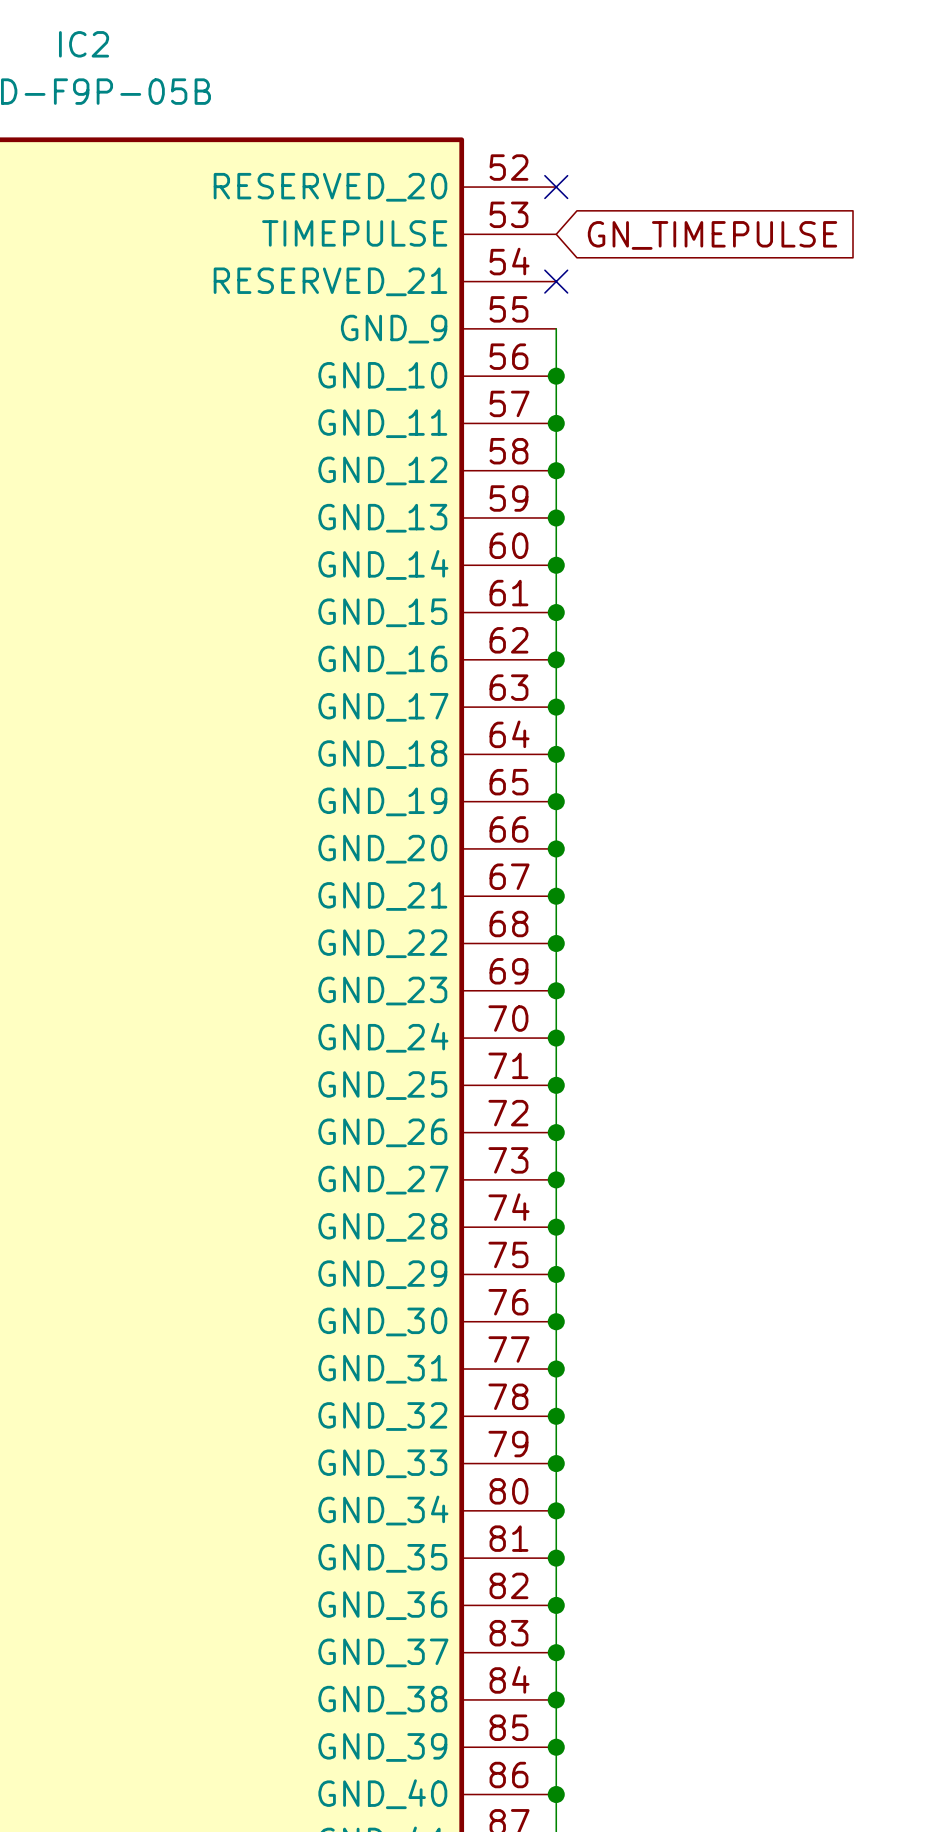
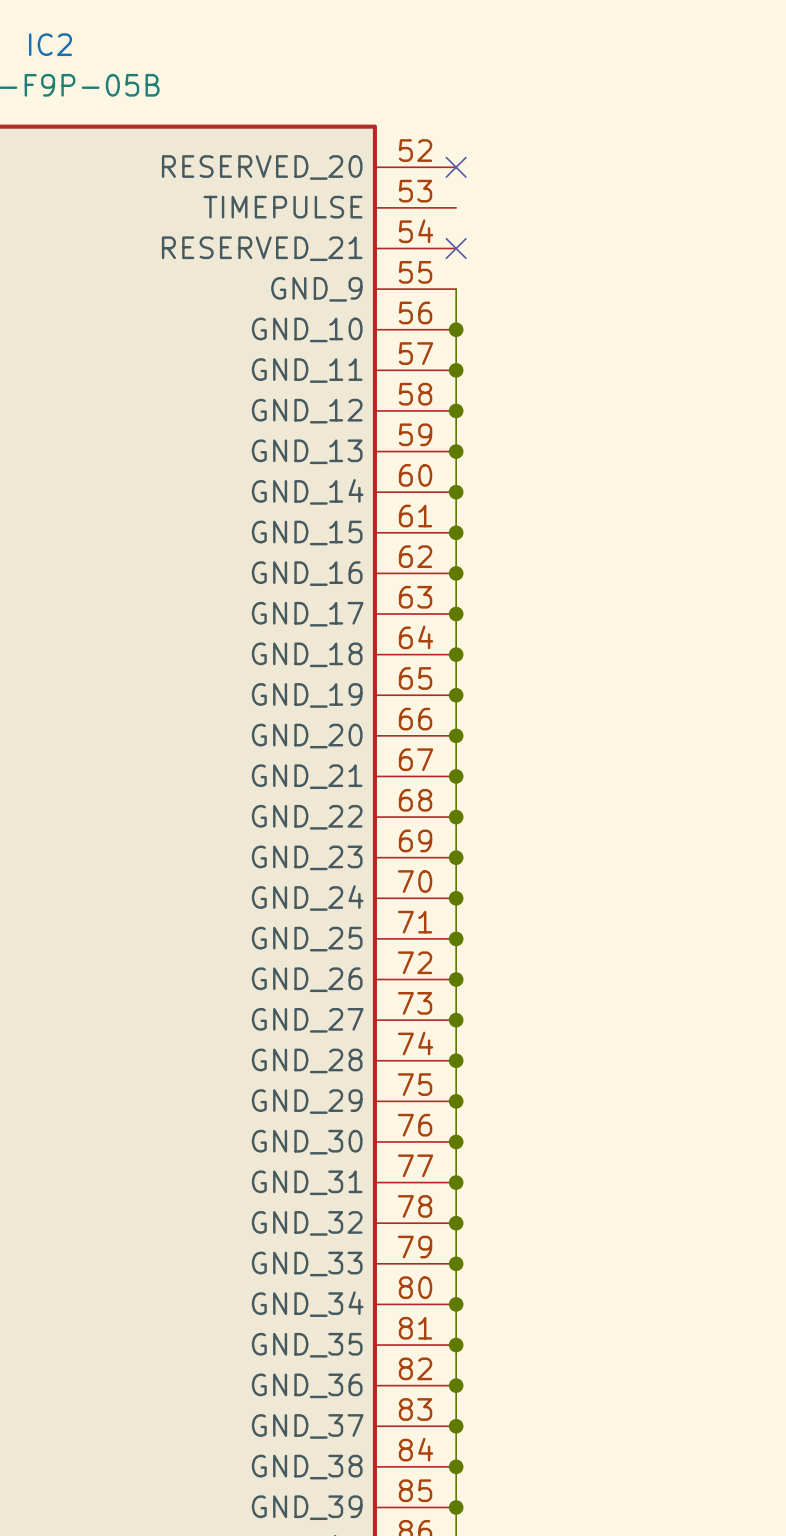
global label: GN_TIMEPULSE (712, 235) -> none

